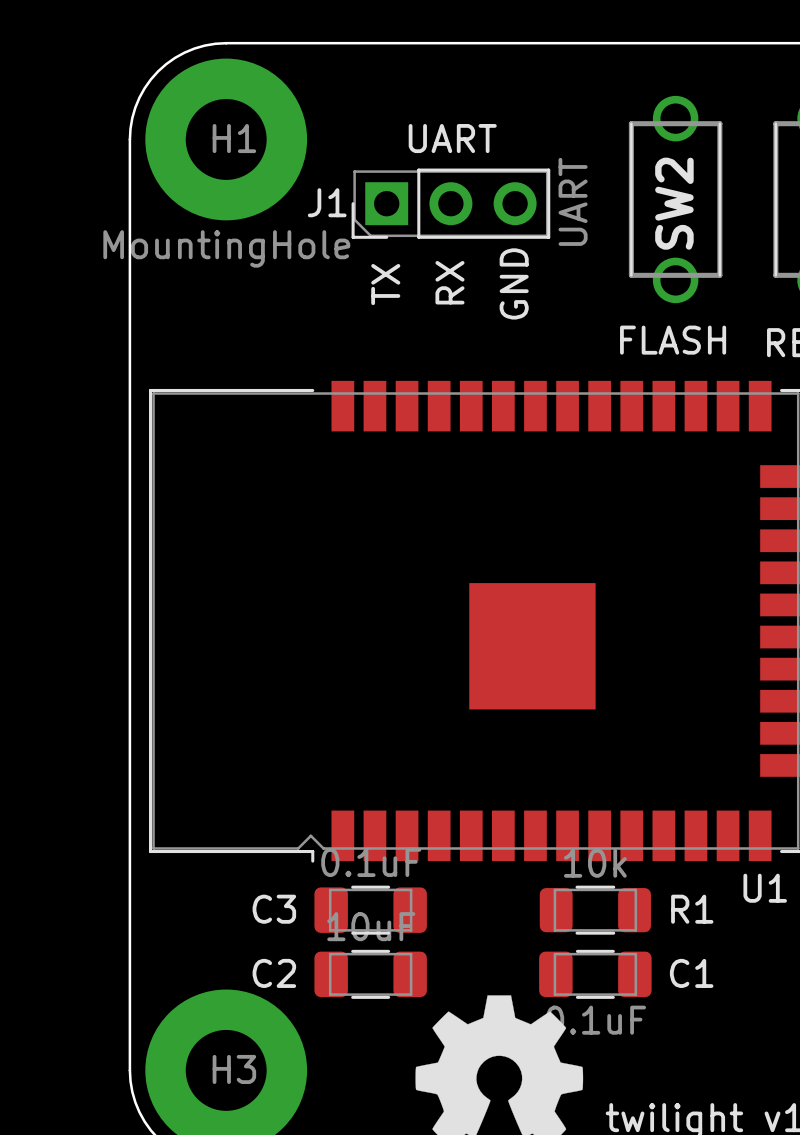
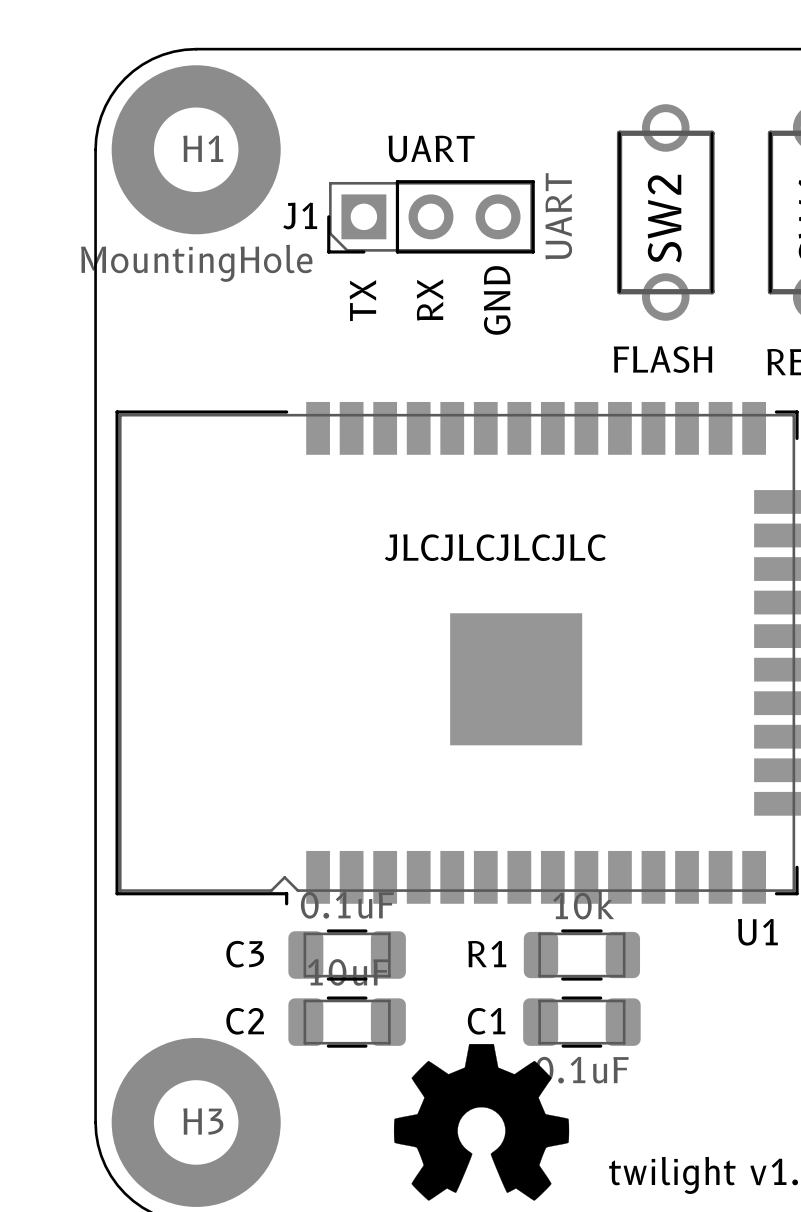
text: none -> JLCJLCJLCJLC (495, 547)
R1 name position: R1 (692, 909) -> R1 (487, 954)
C1 name position: C1 (691, 973) -> C1 (486, 1021)

